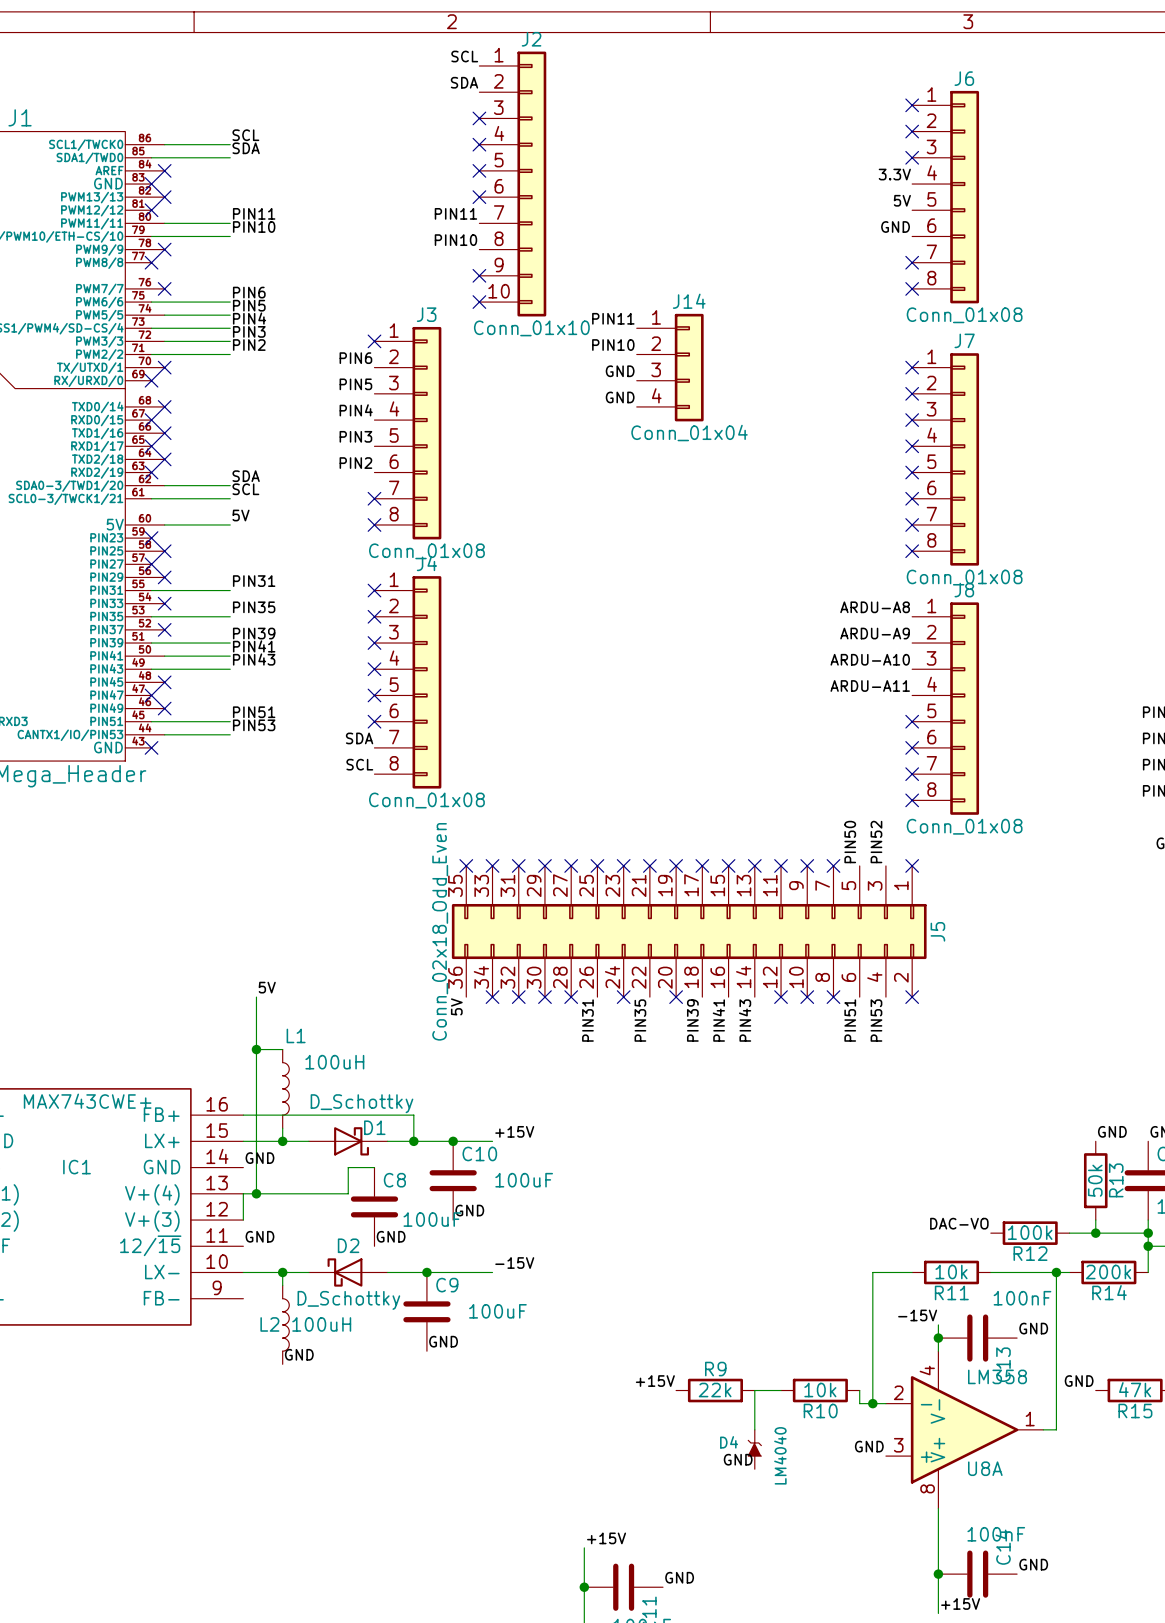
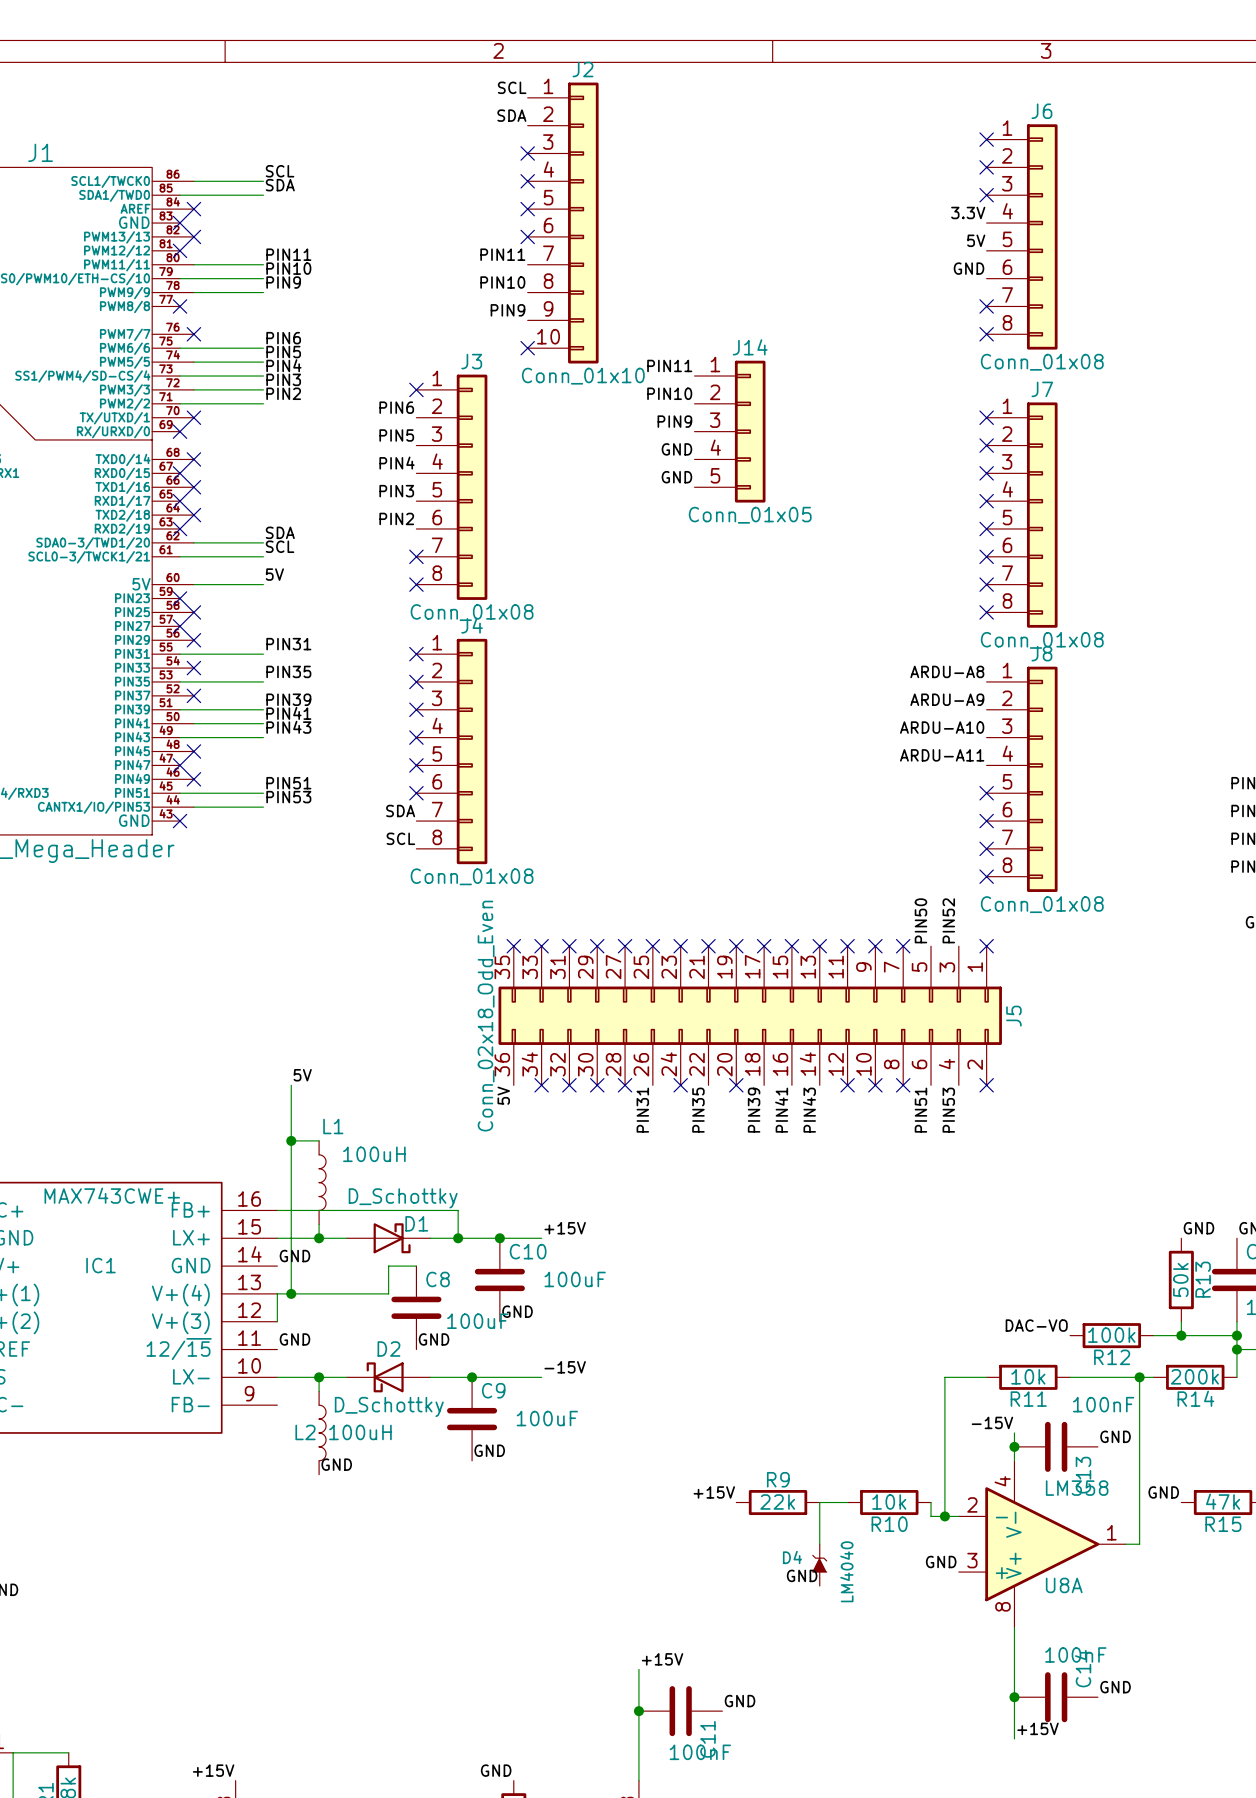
label: none -> PIN9 (283, 282)
wire: none -> (193, 292) (263, 292)
no-connect mark: (164, 249) -> none
label: none -> PIN9 (508, 310)
no-connect mark: (479, 275) -> none
J14 symbol: [636, 313, 704, 422] -> [694, 360, 766, 503]
label: GND (620, 371) -> PIN9 (674, 421)
label: none -> GND (676, 477)
J14 value: Conn_01x04 (689, 433) -> Conn_01x05 (750, 515)

